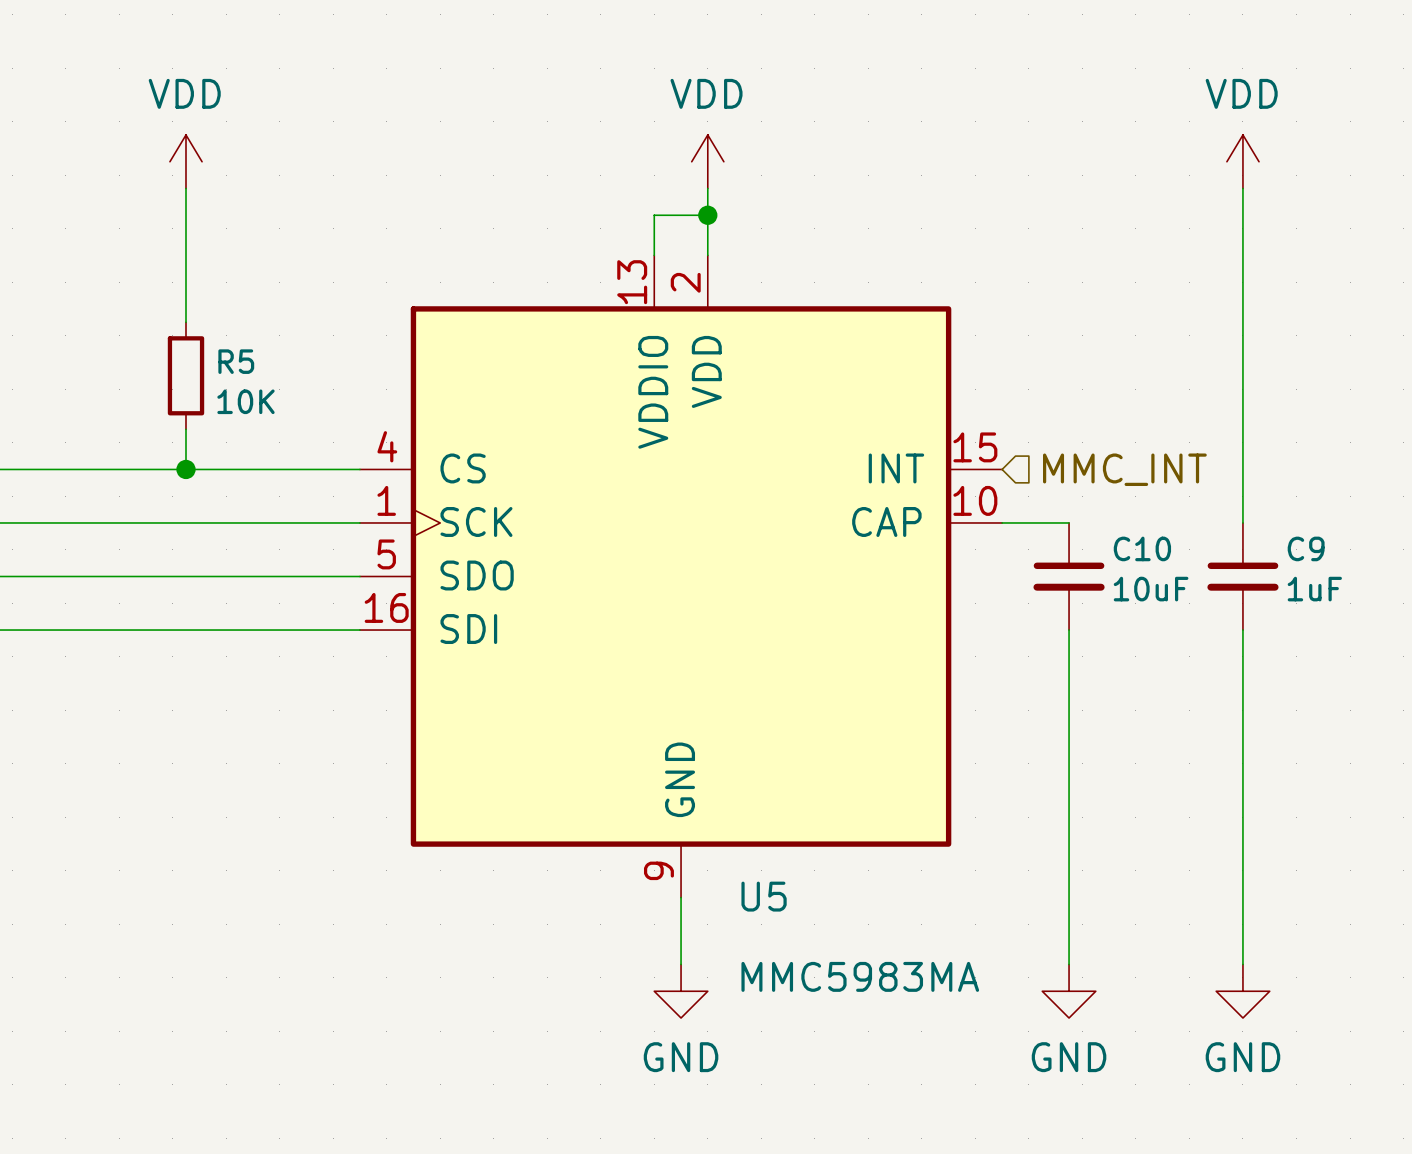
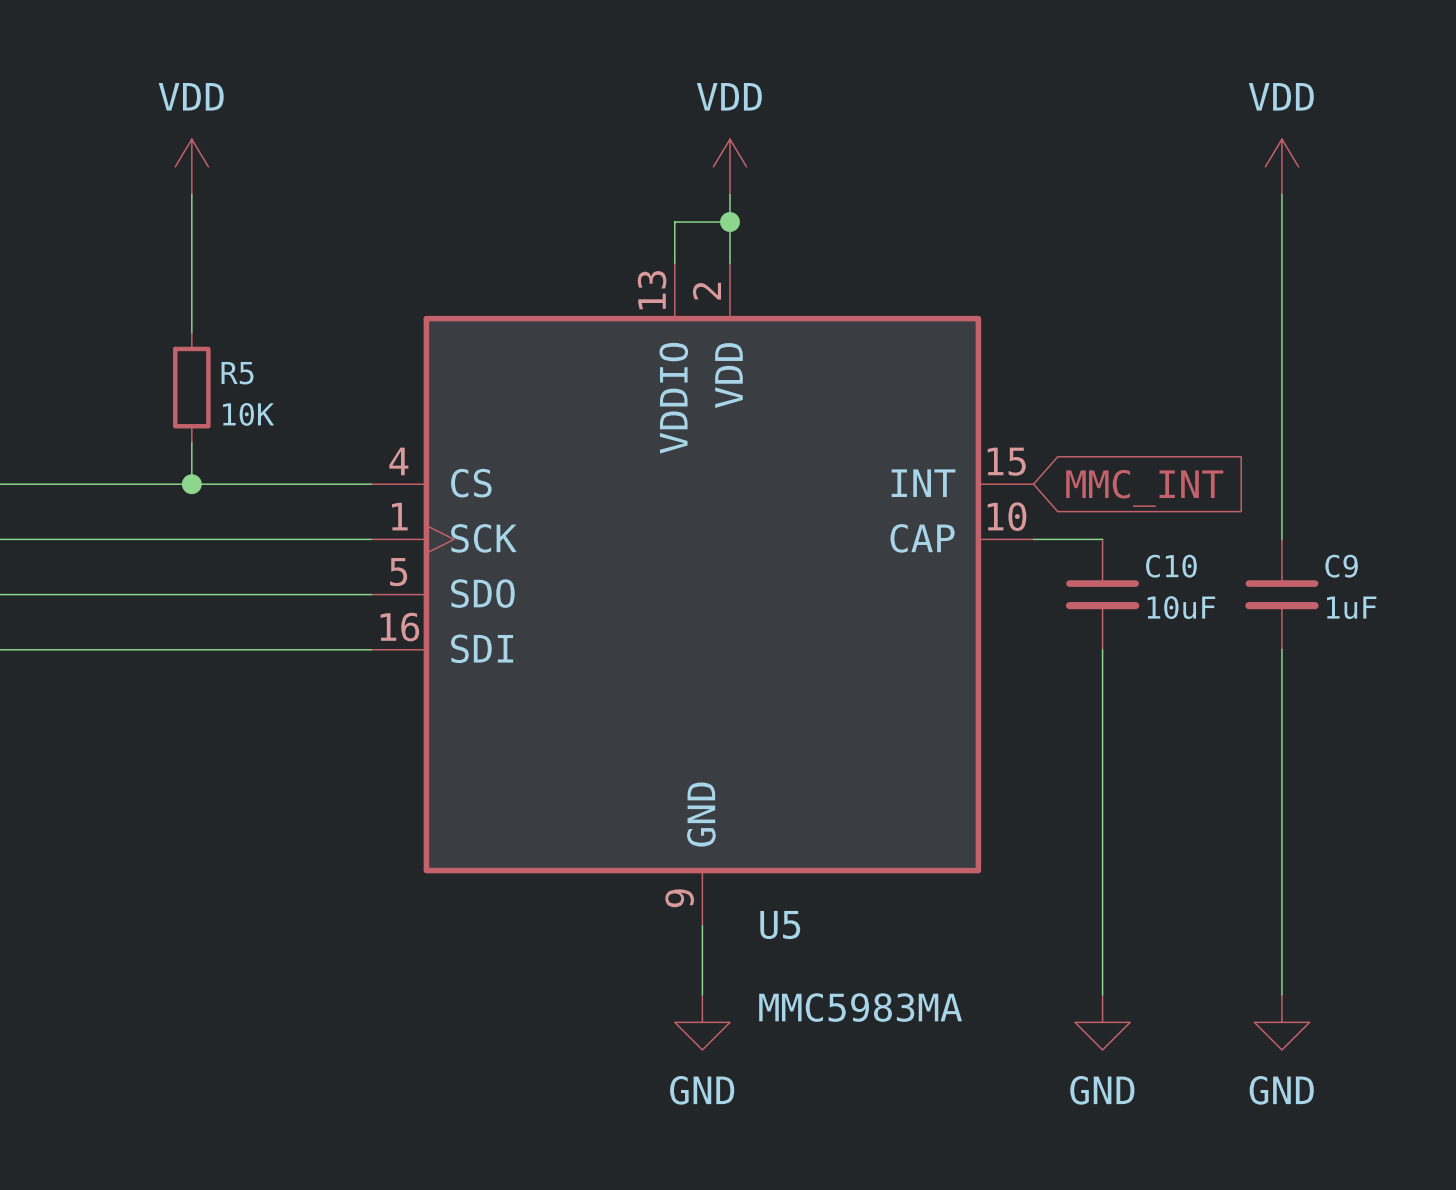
hierarchical label: MMC_INT (1124, 469) -> none
global label: none -> MMC_INT (1144, 488)

